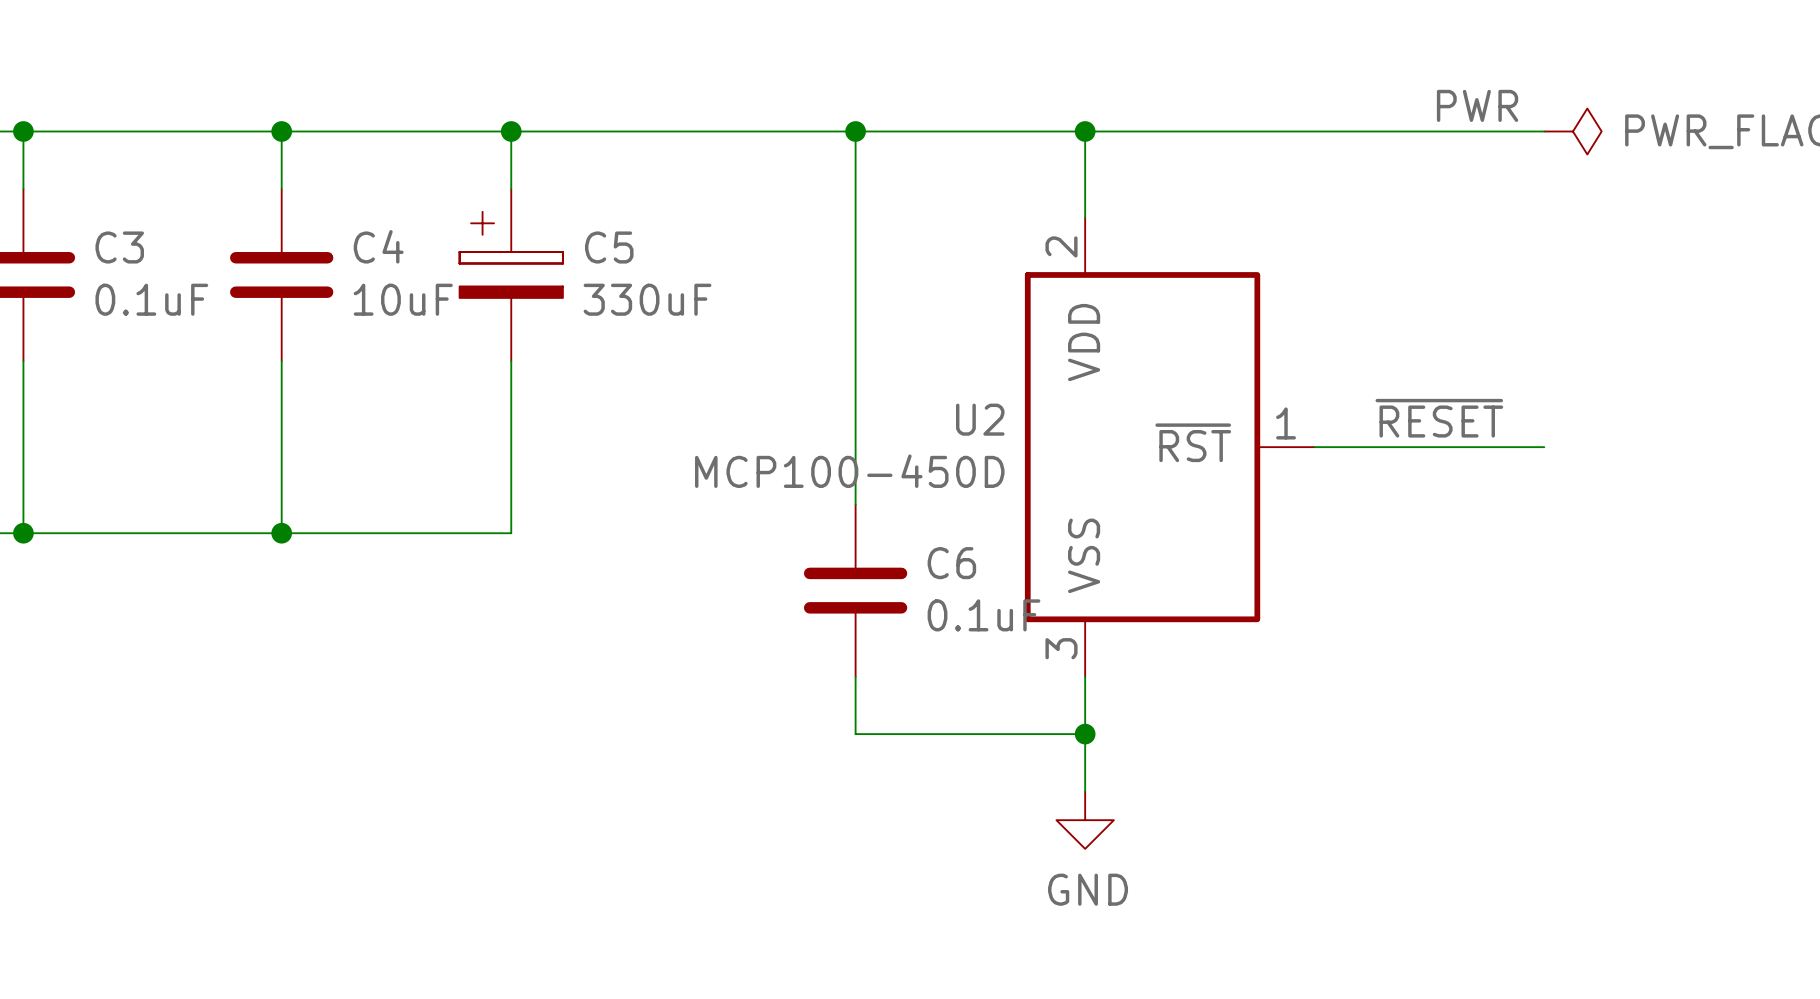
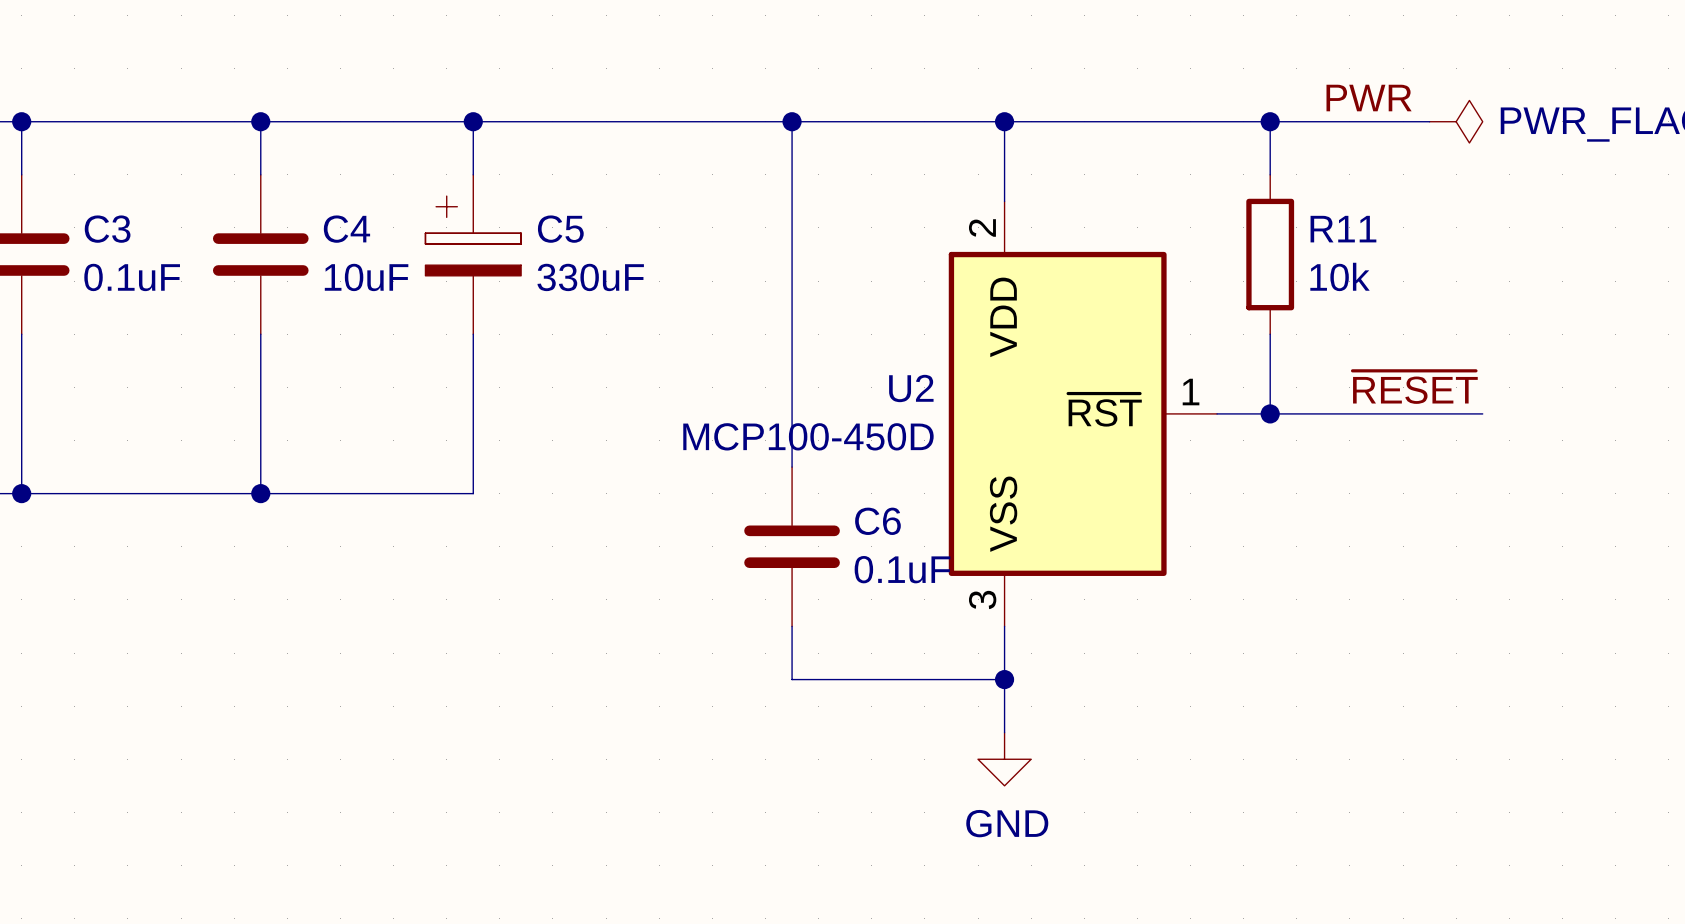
wire: none -> (1270, 121) (1270, 174)
junction: none -> (1270, 121)
R11: none -> 10k (1270, 254)
wire: none -> (1270, 334) (1270, 413)
label position: ~{RESET} (1439, 418) -> ~{RESET} (1415, 387)
junction: none -> (1270, 413)
wire: none -> (1429, 413) (1482, 413)

